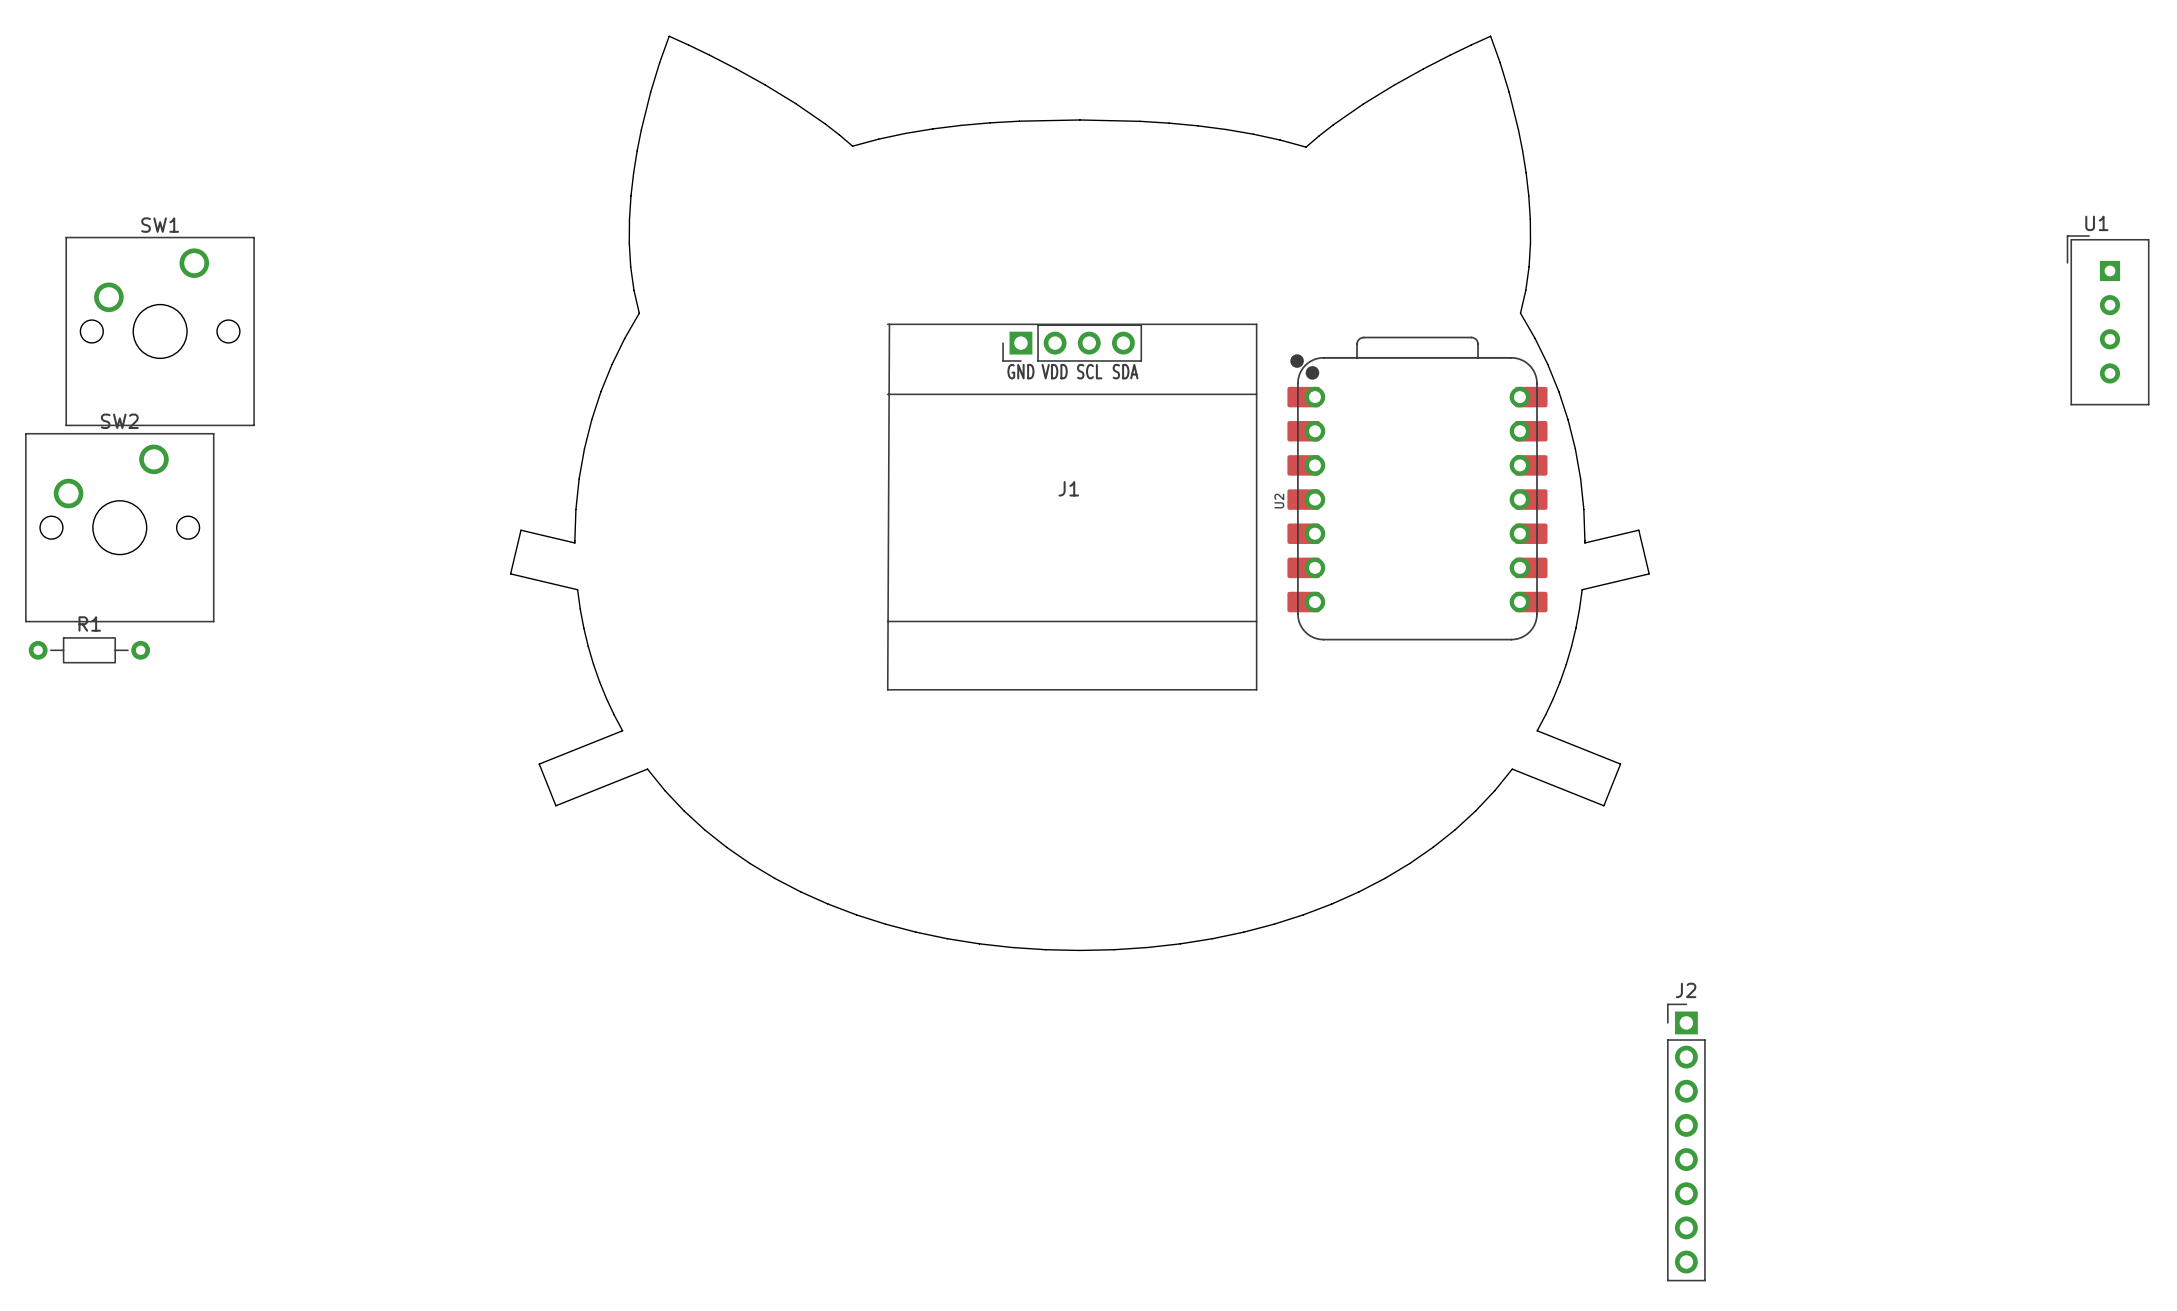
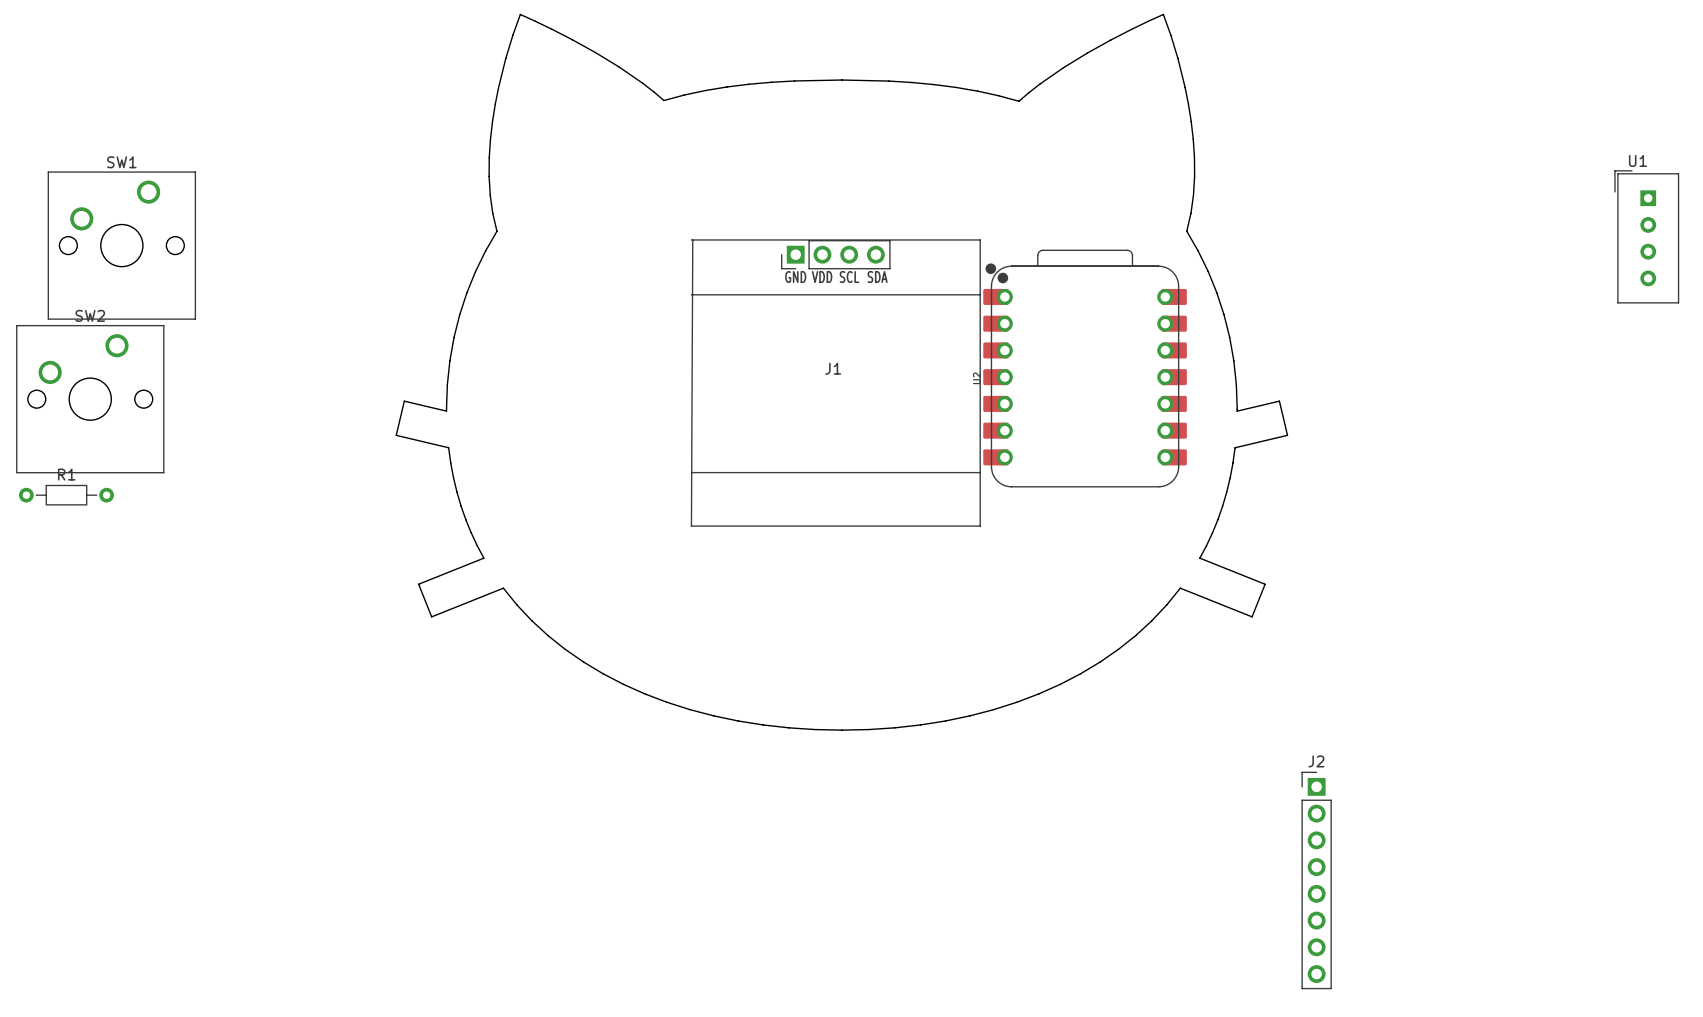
U2 position: (1417, 488) -> (1085, 368)

